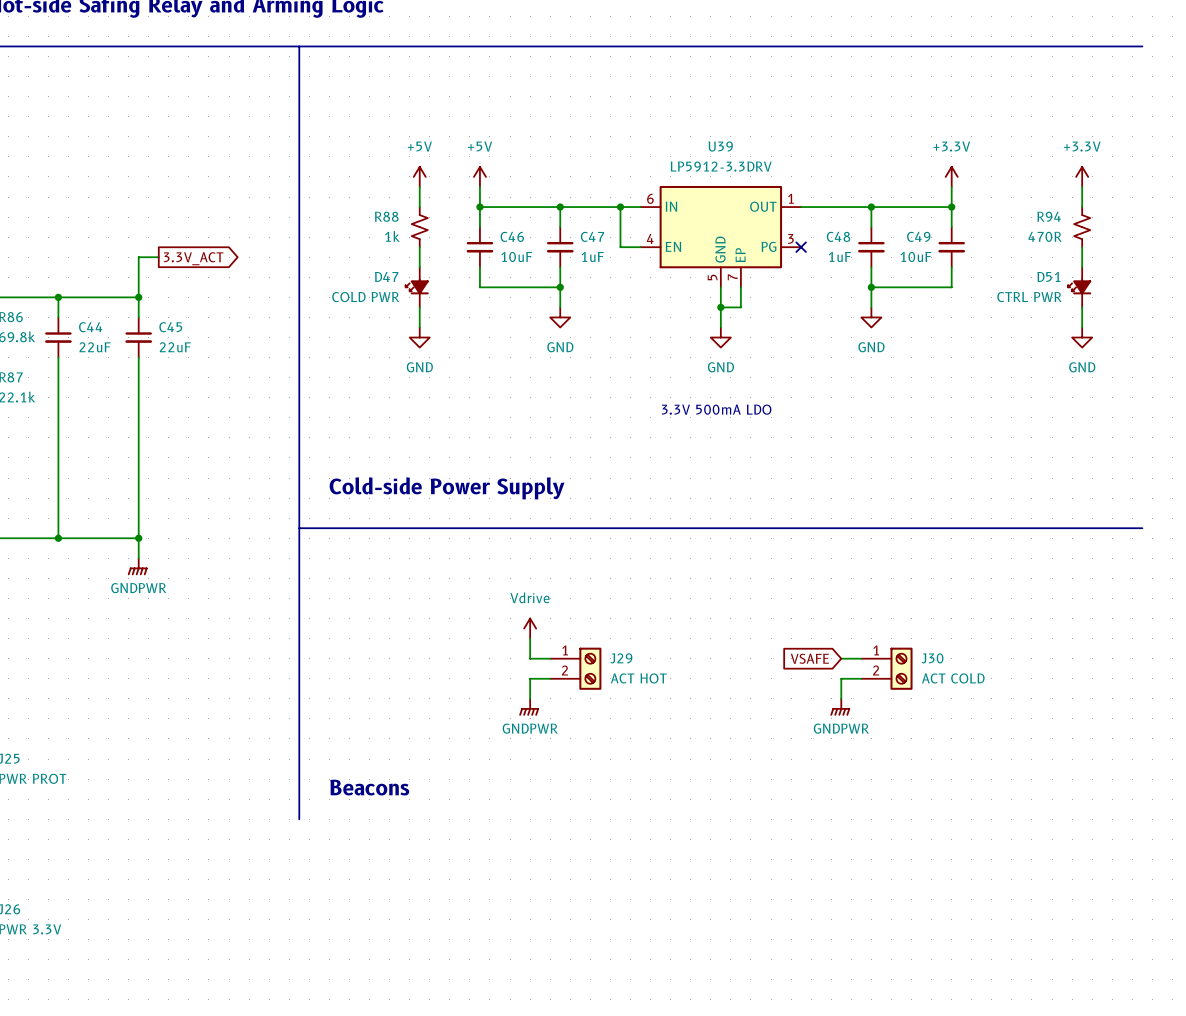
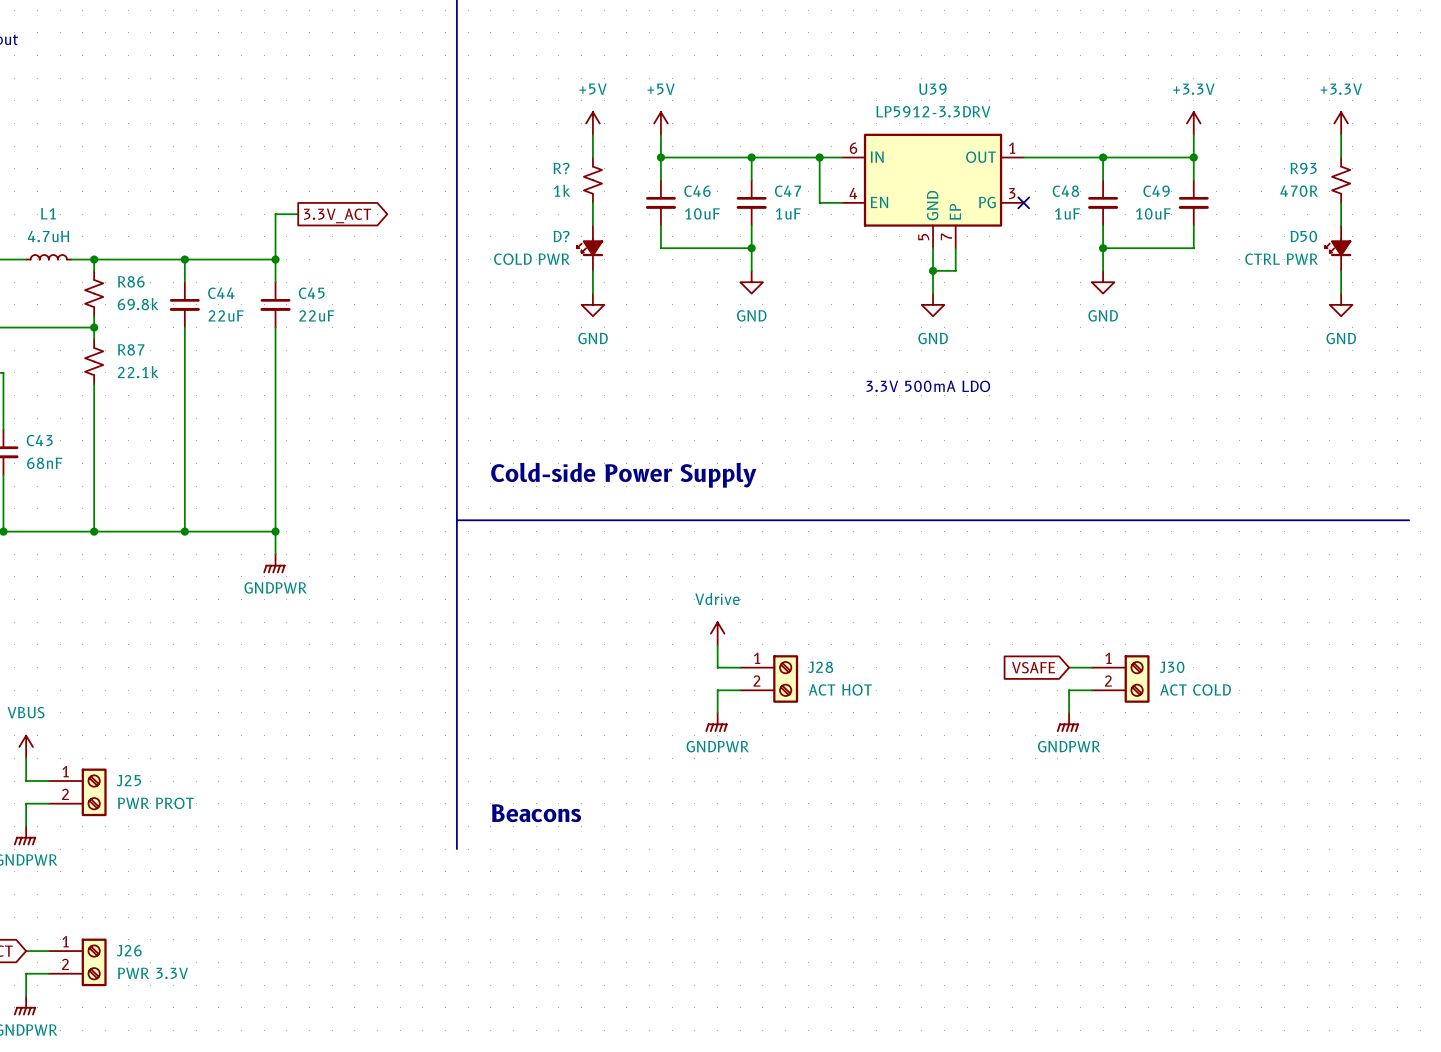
R88 name: R88 (386, 216) -> R? (561, 168)
R94 name: R94 (1049, 216) -> R93 (1303, 168)
D47 name: D47 (386, 276) -> D? (561, 236)
D51 name: D51 (1048, 276) -> D50 (1303, 236)
J29 name: J29 (621, 658) -> J28 (820, 667)

